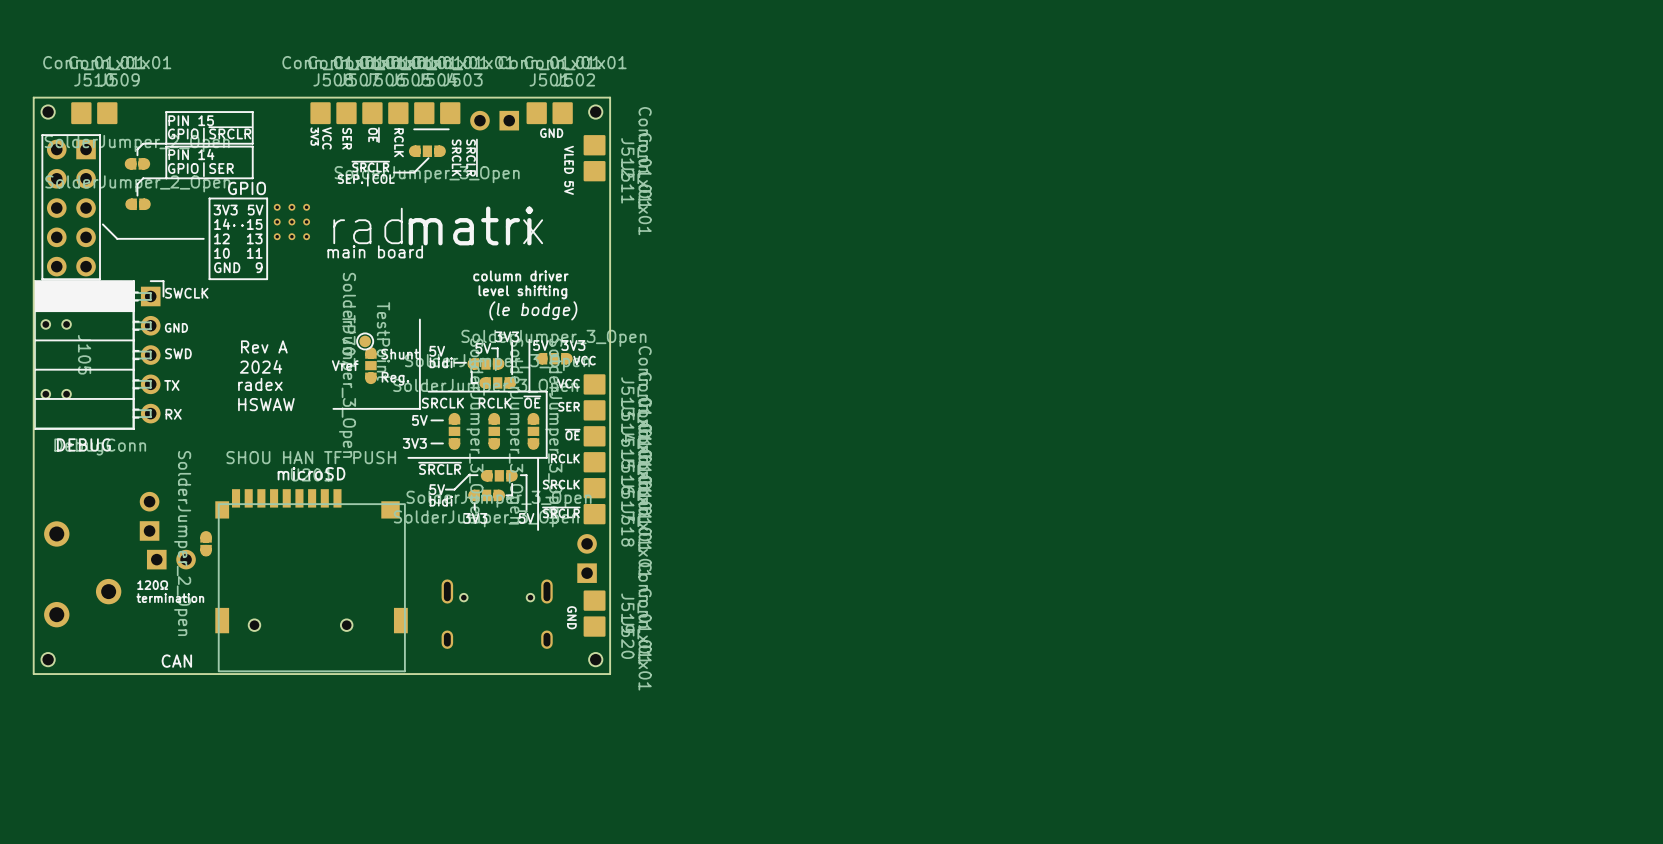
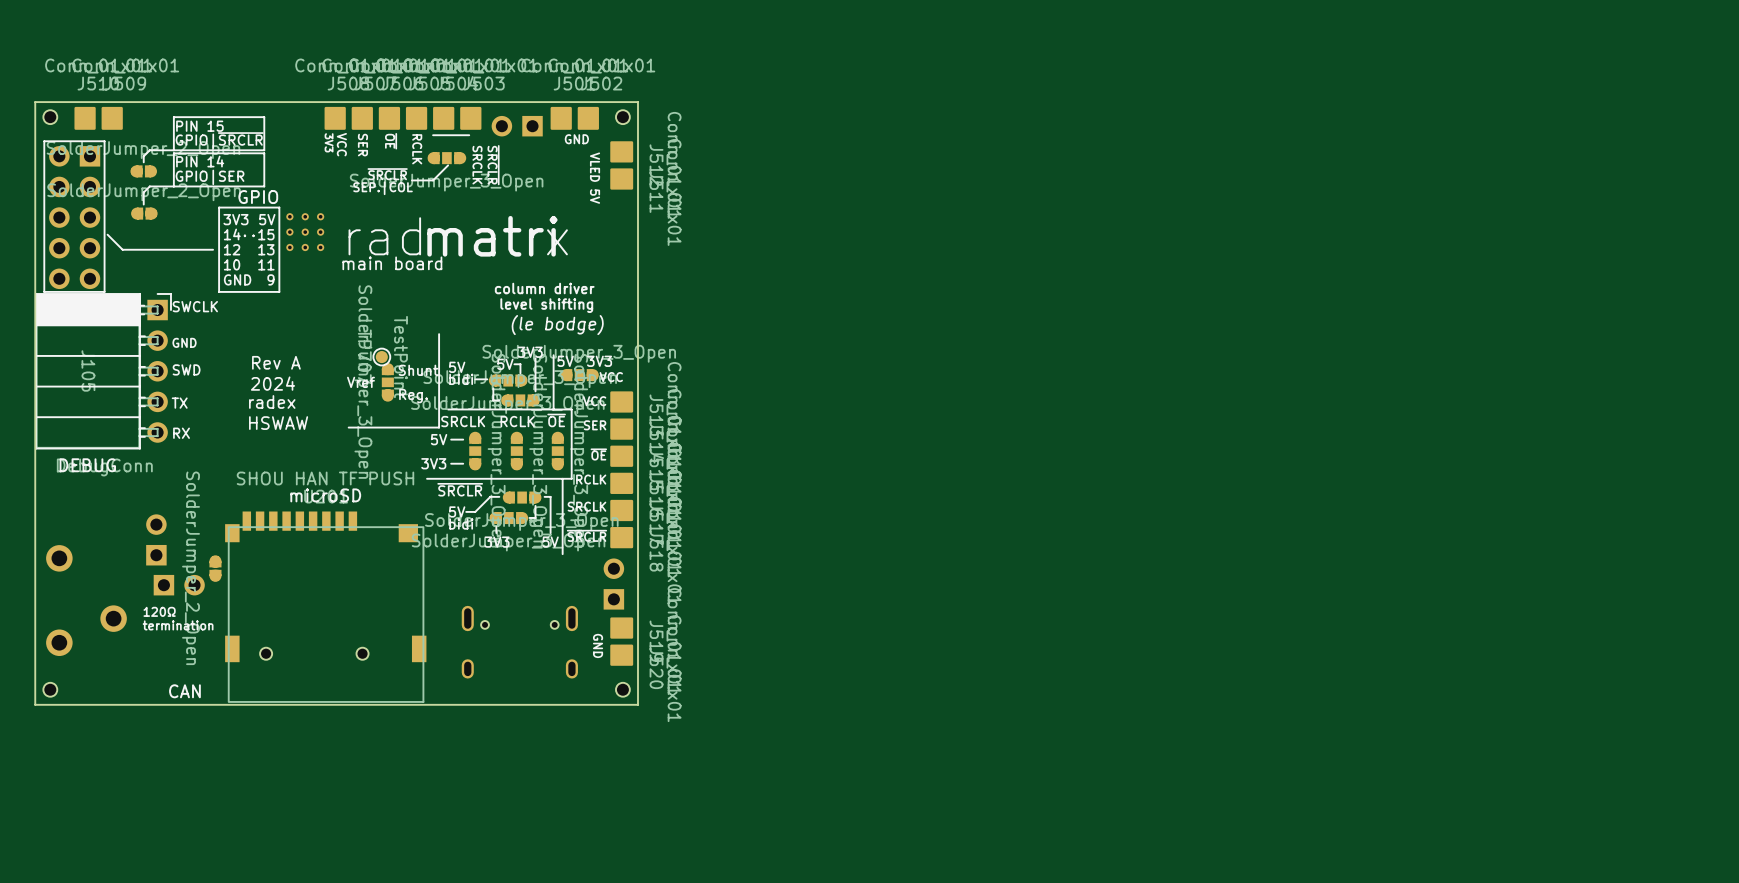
part: (56, 324) -> none
part: (56, 394) -> none

